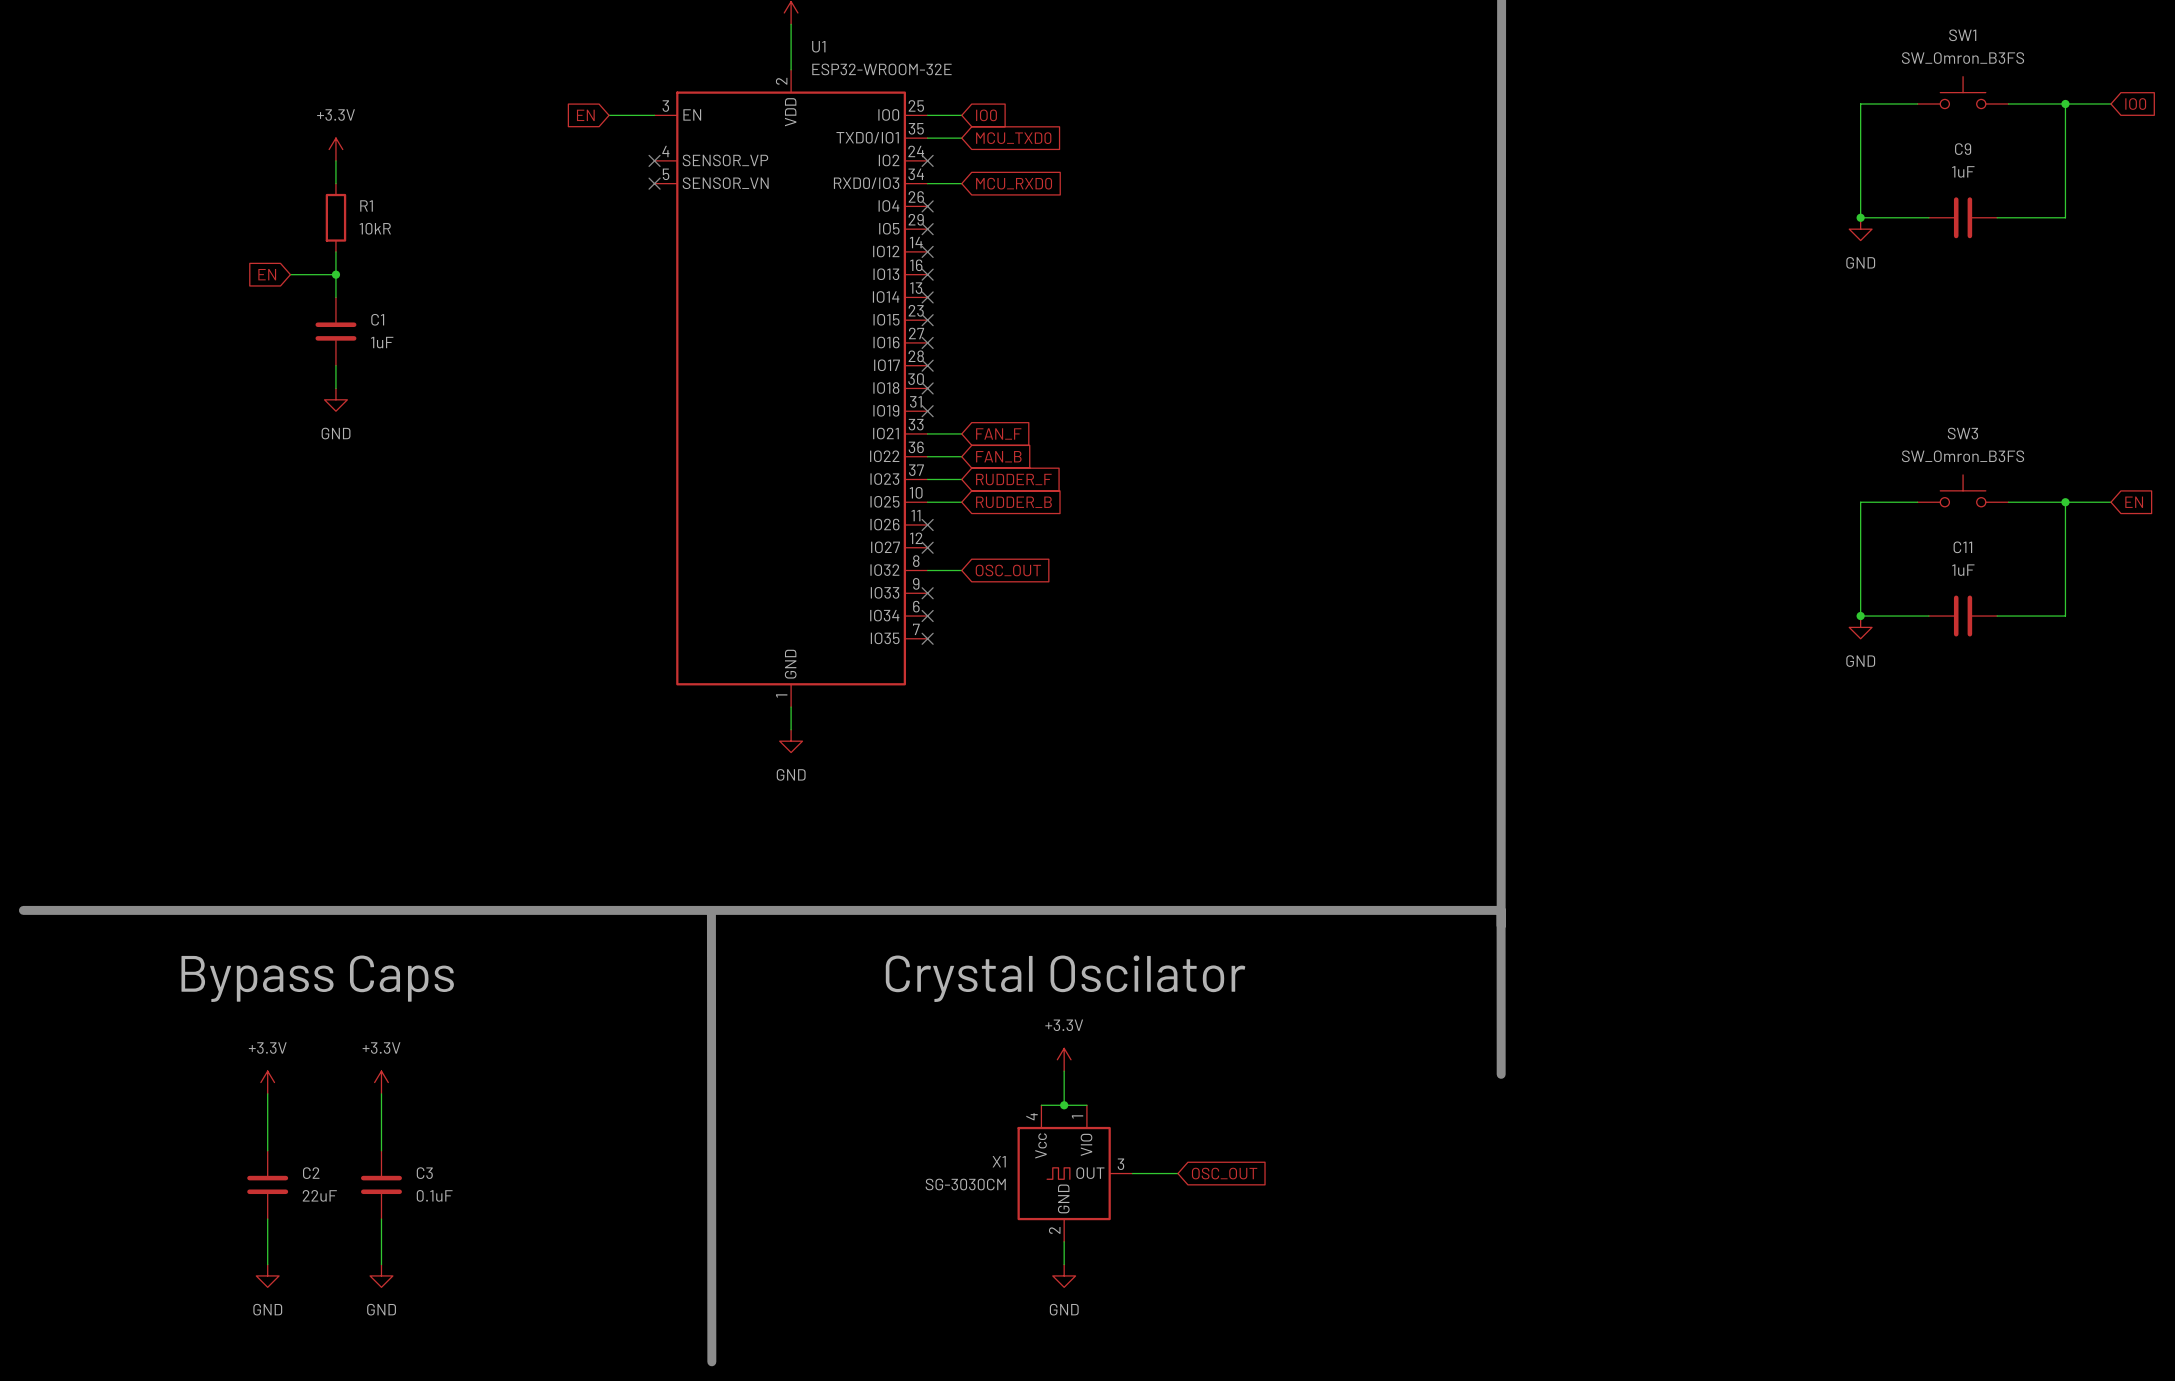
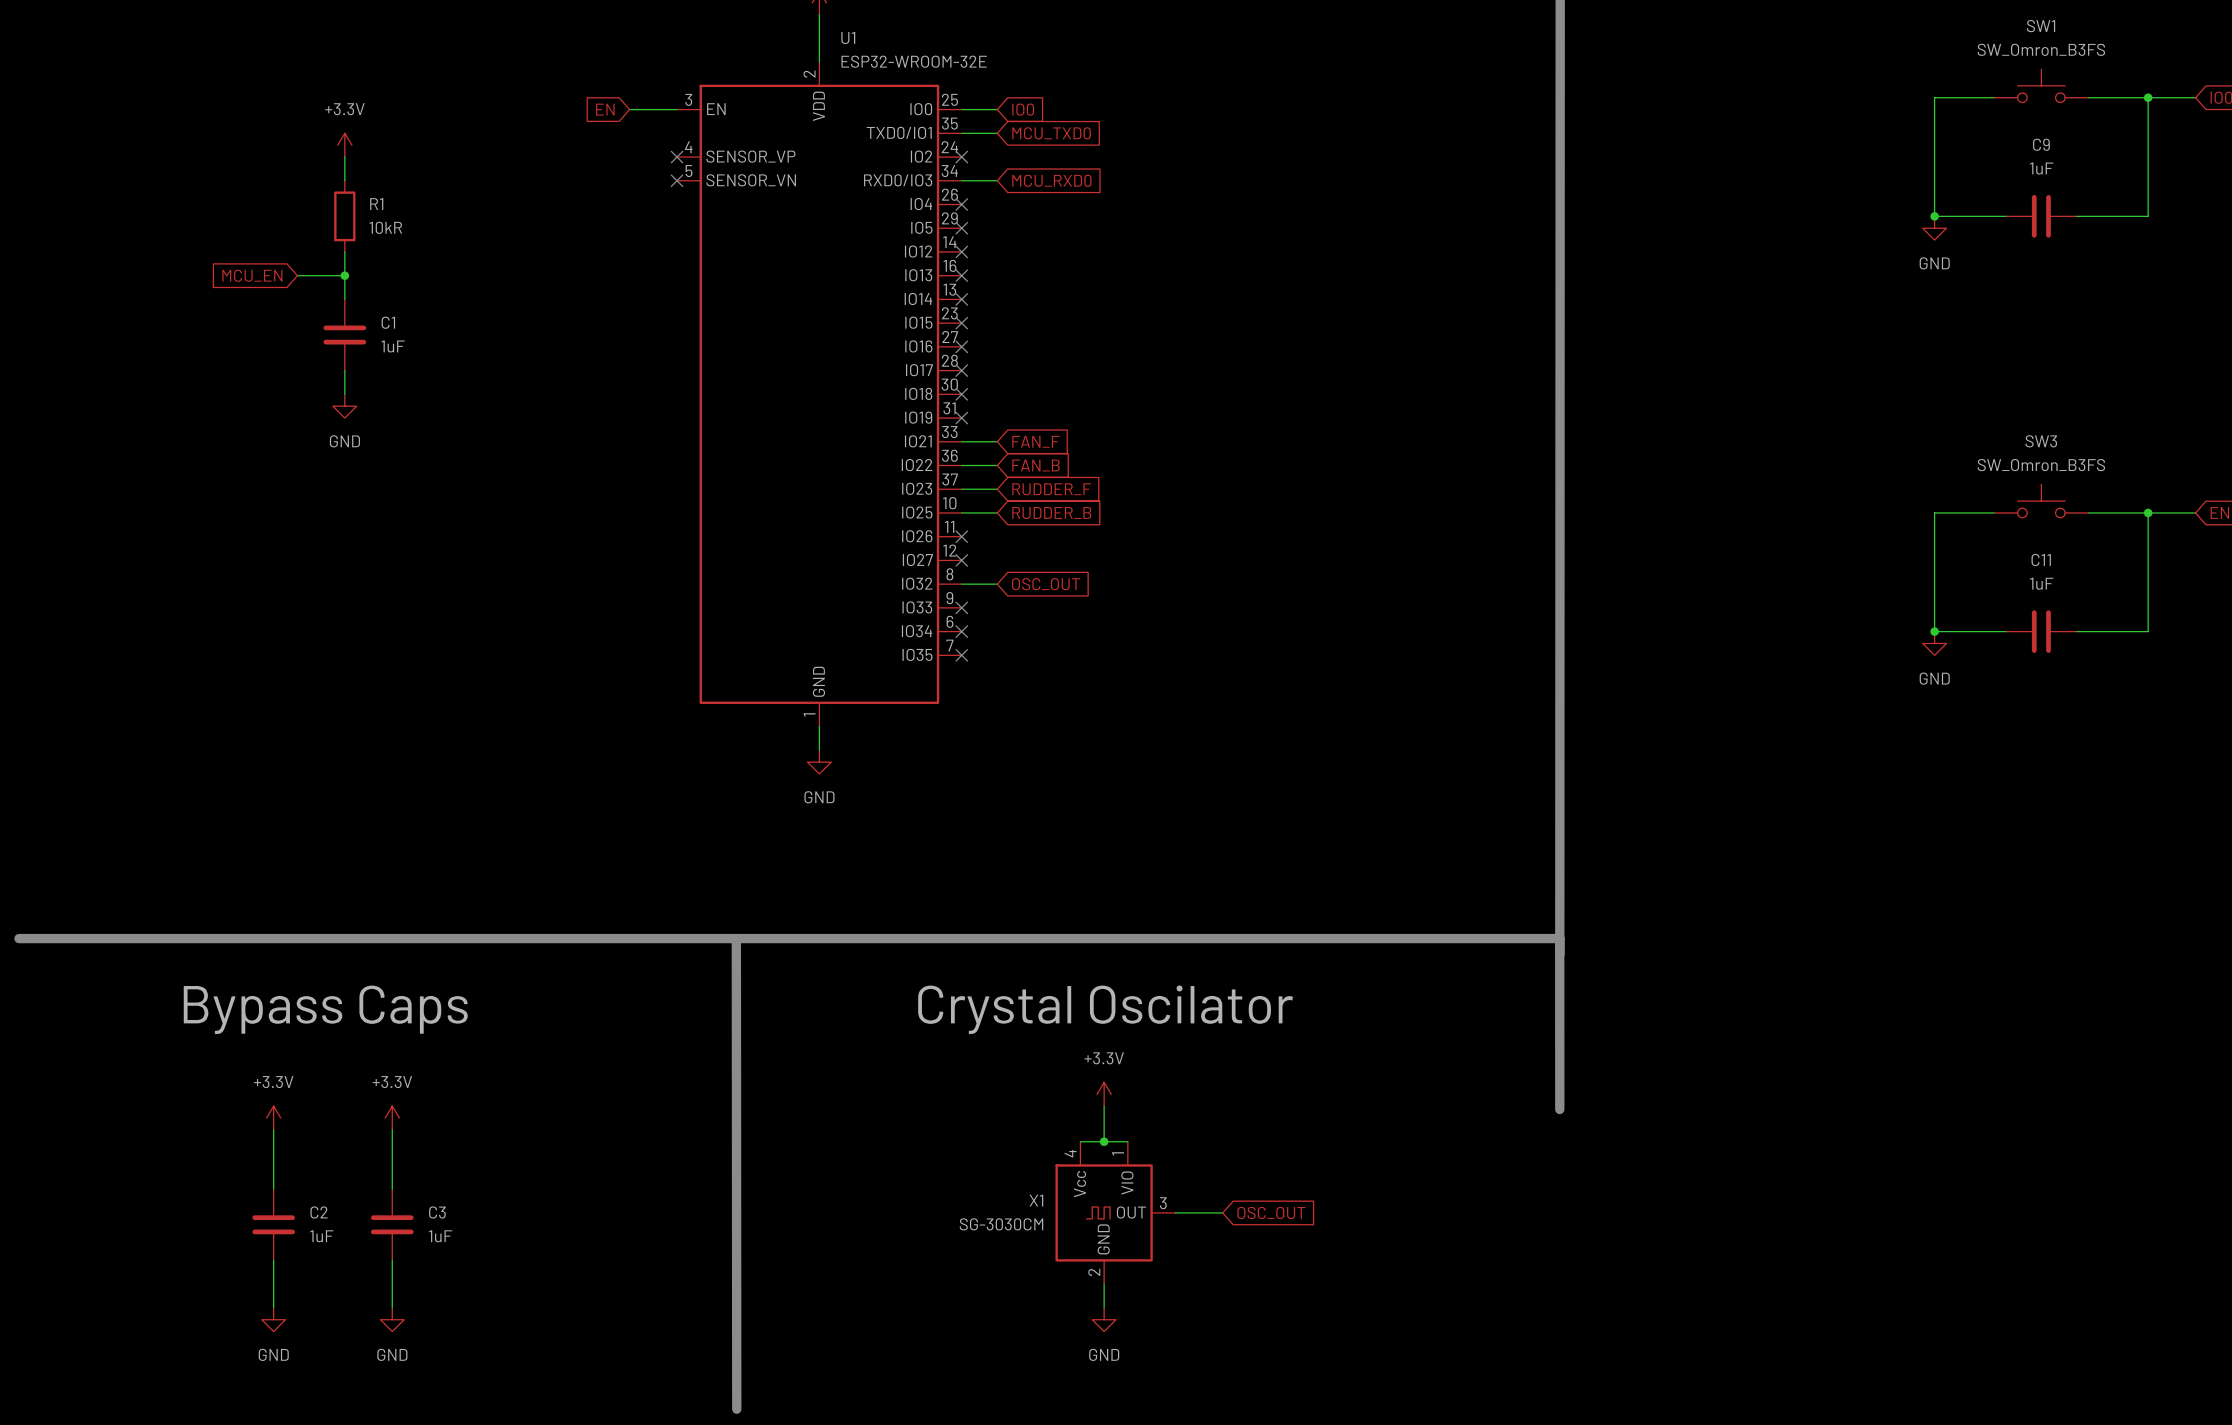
global label: EN (267, 274) -> MCU_EN (252, 275)
C2 value: 22uF (319, 1195) -> 1uF (321, 1236)
C3 value: 0.1uF (434, 1195) -> 1uF (440, 1236)

